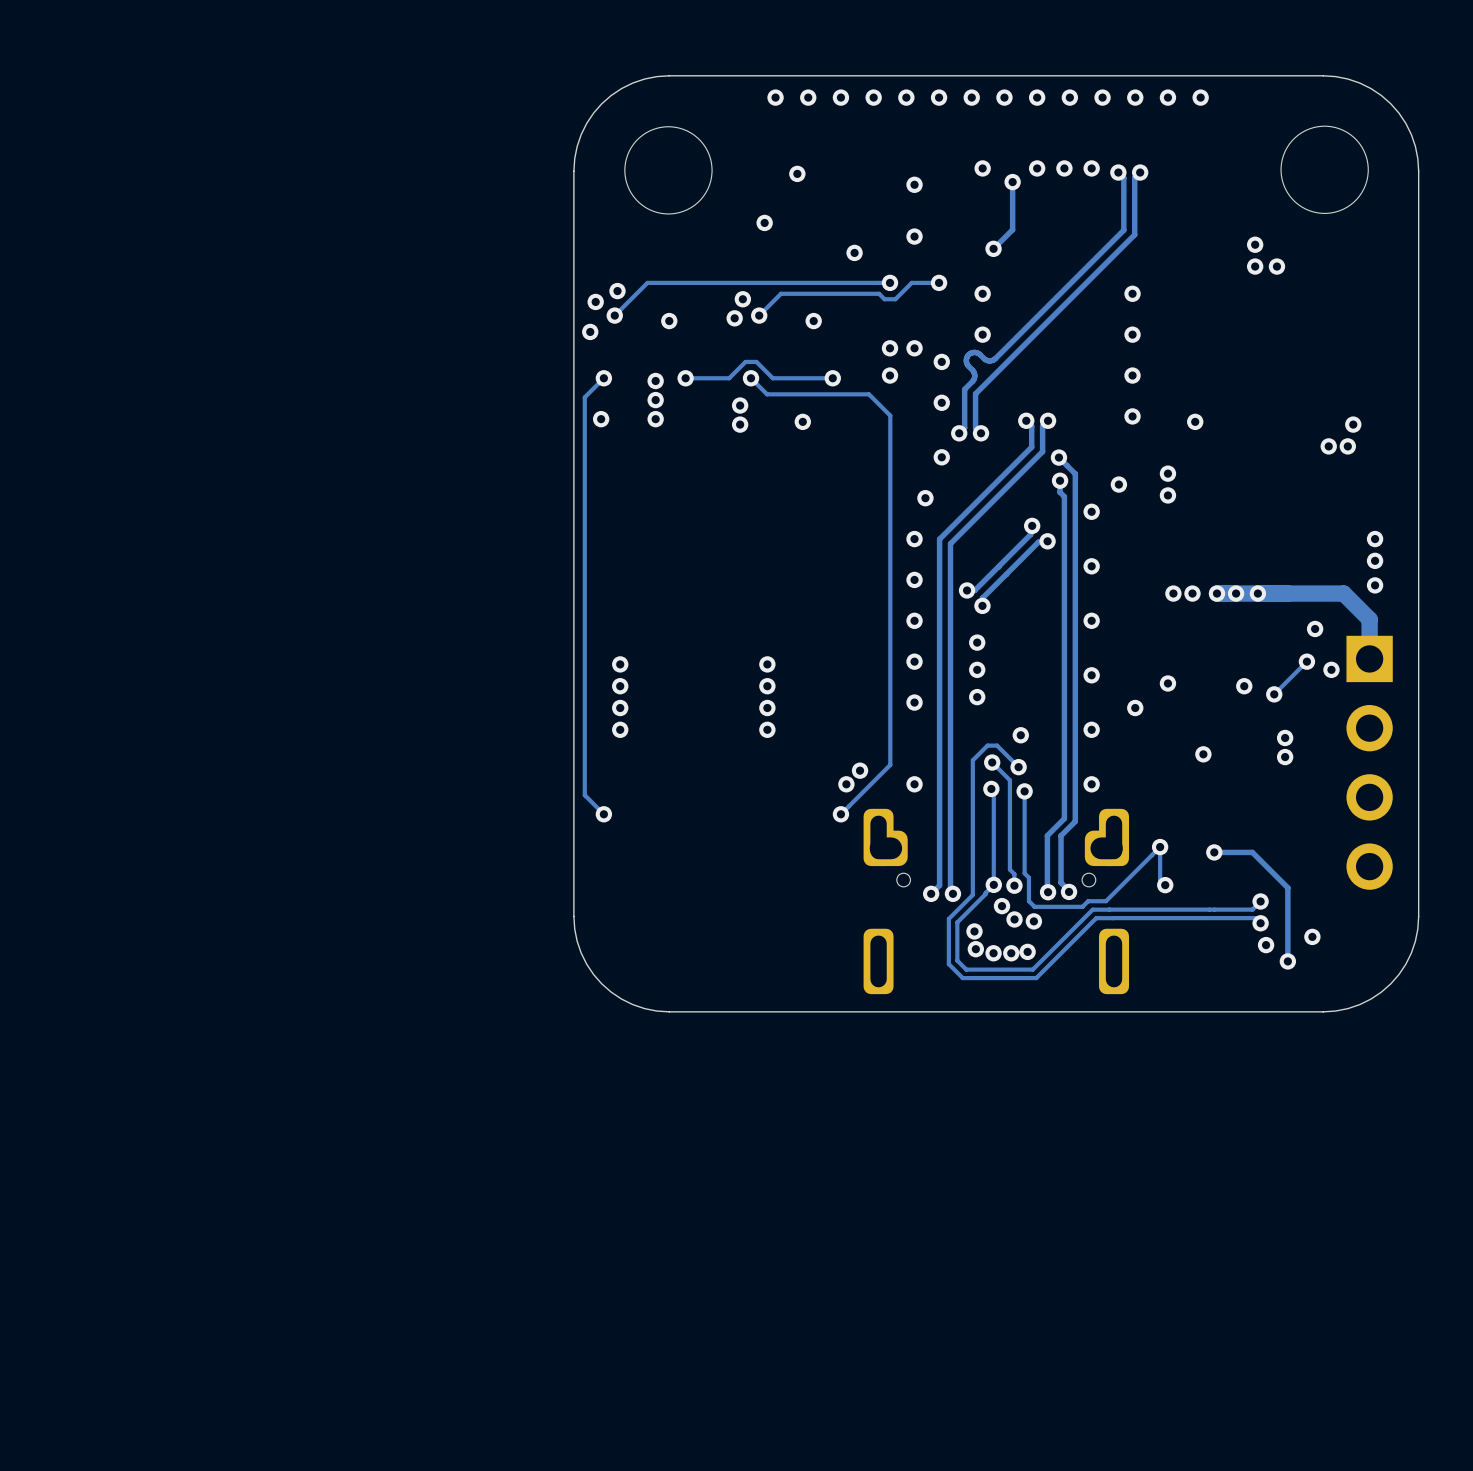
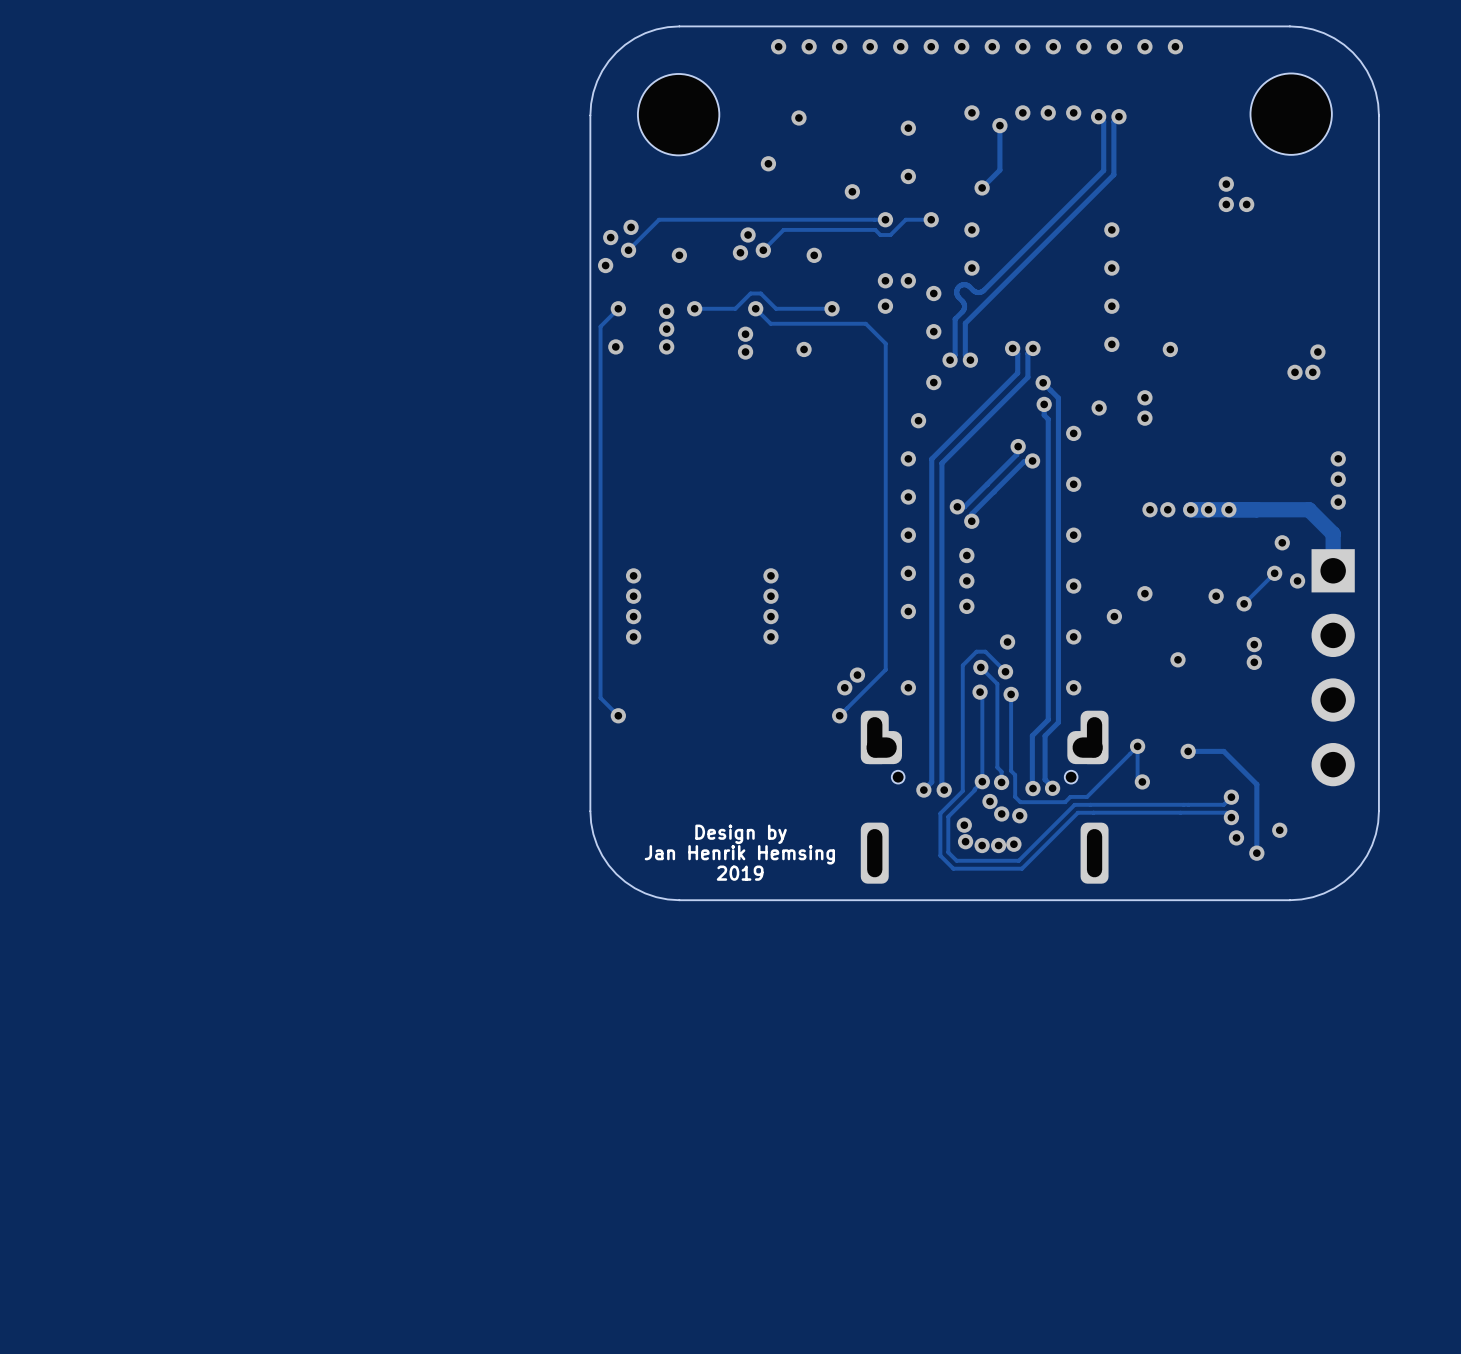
text: none -> Design by (741, 834)
text: none -> Jan Henrik Hemsing (739, 854)
text: none -> 2019 (740, 873)

